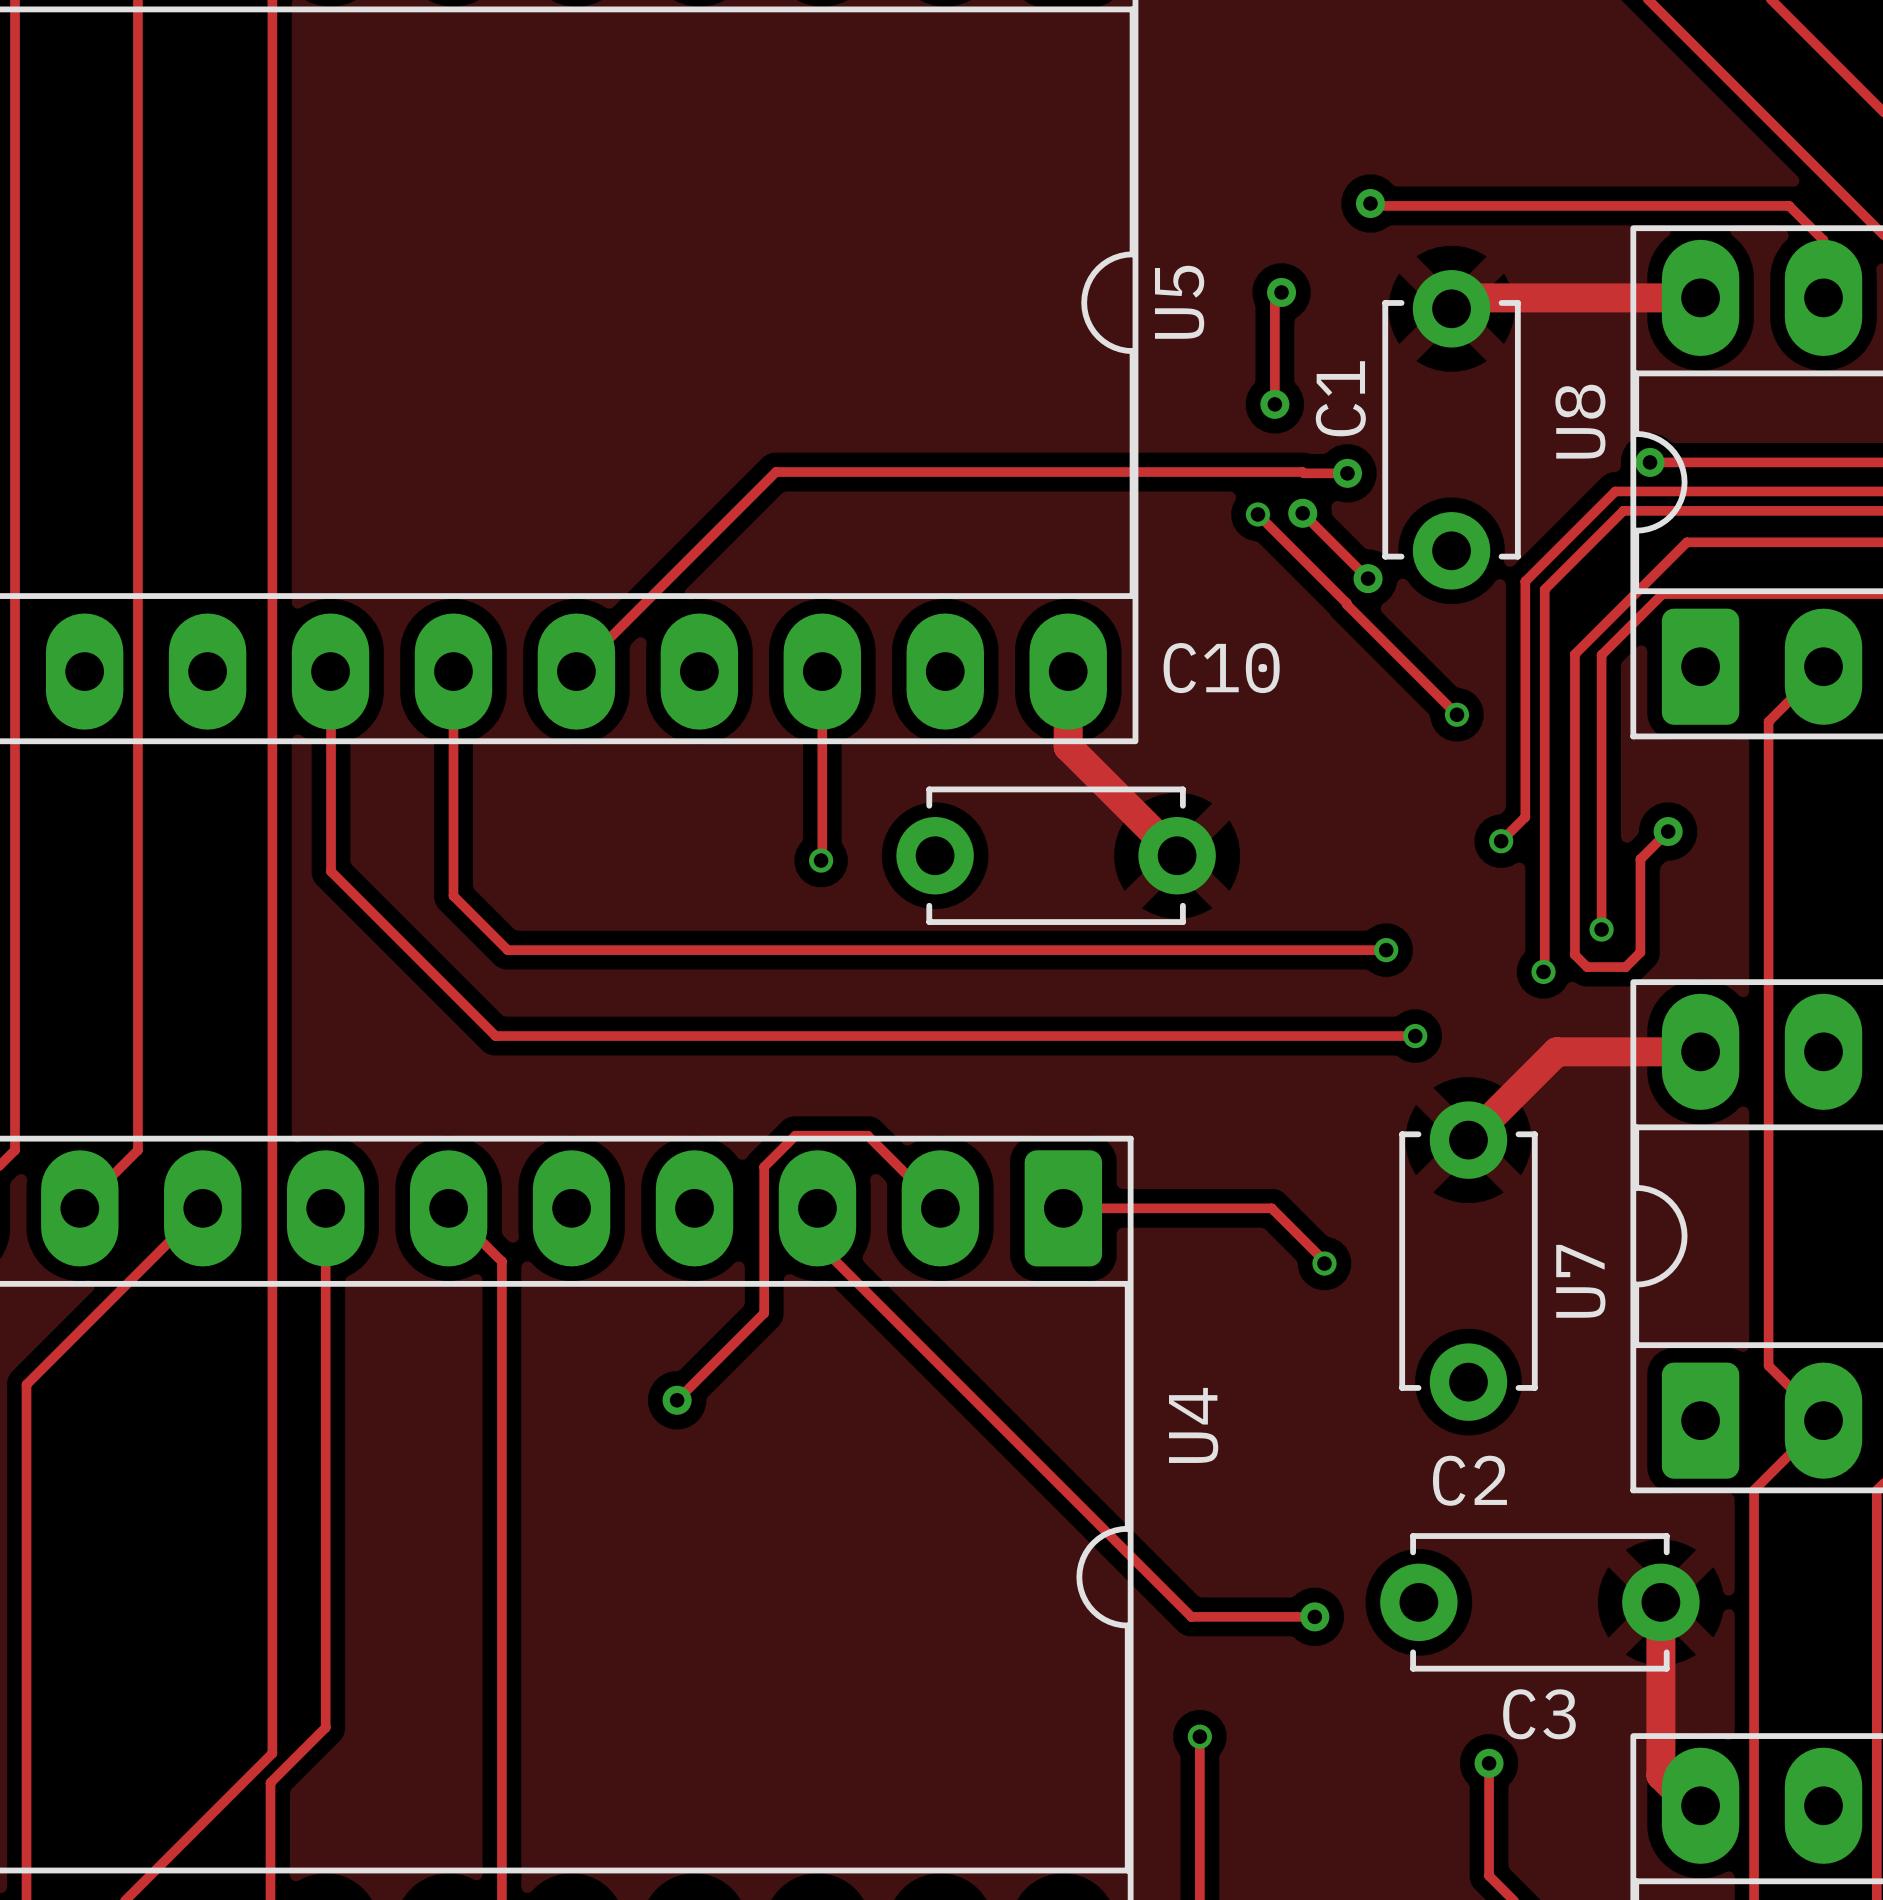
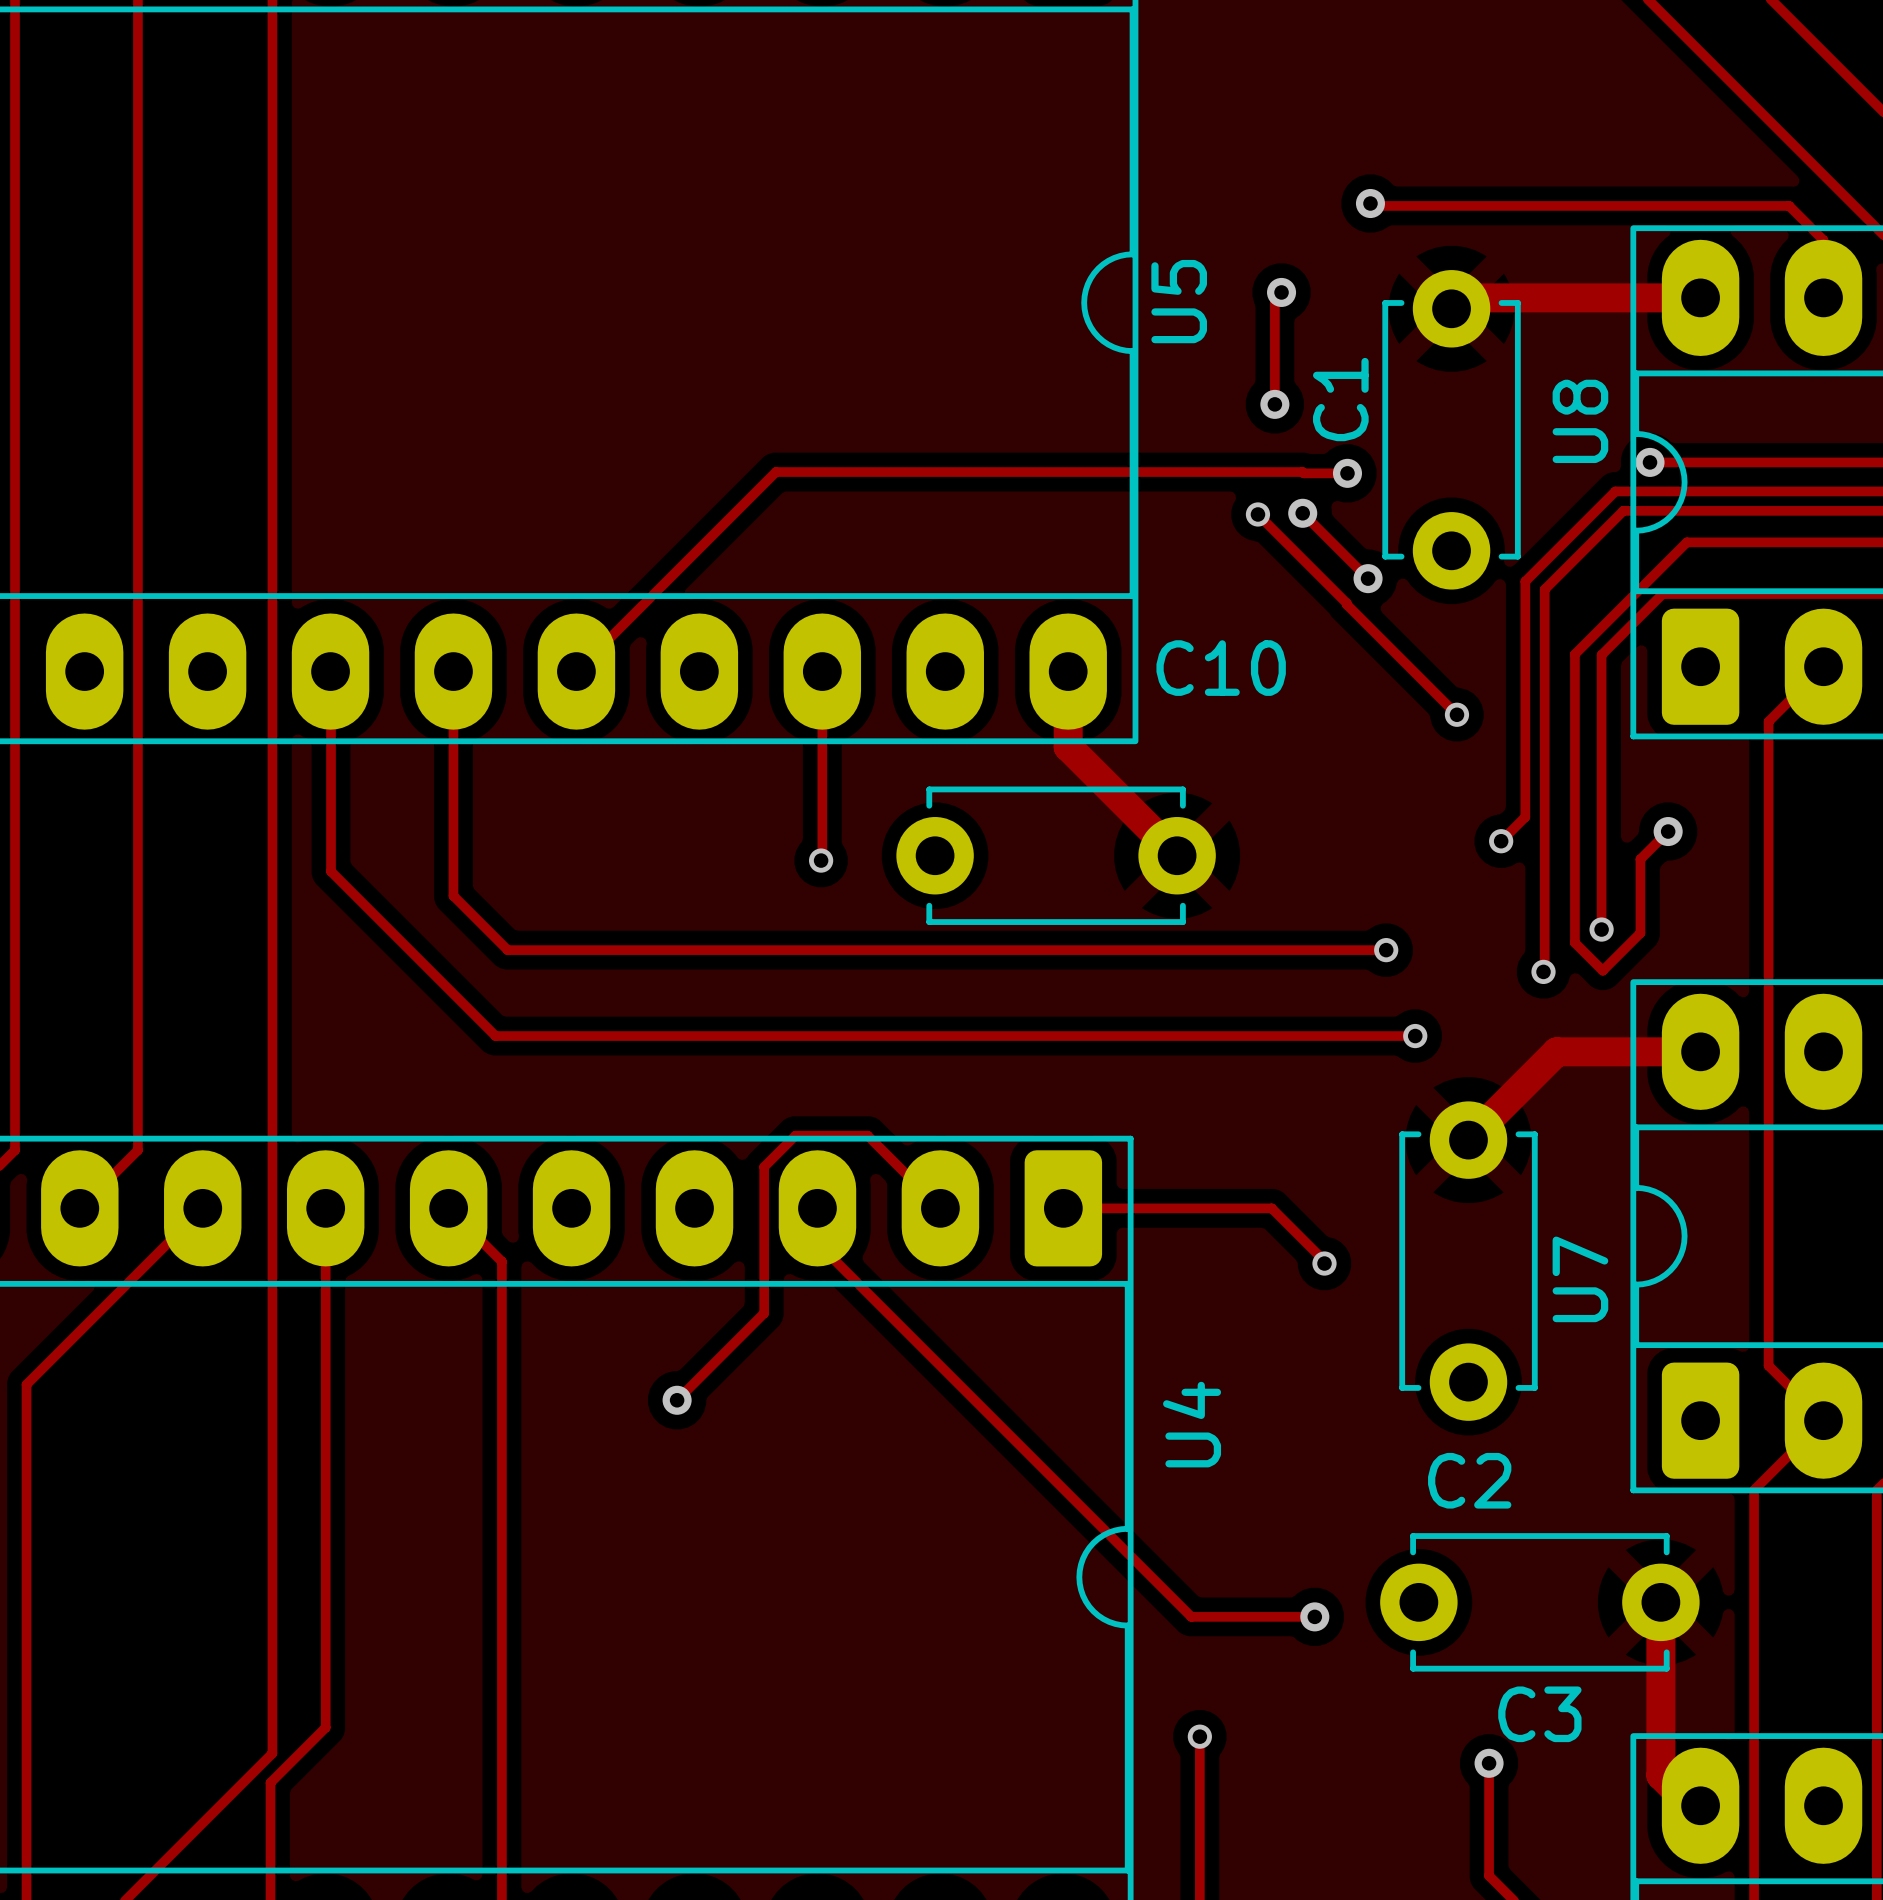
track: (1640, 933) (1640, 952) (1625, 967) (1587, 967) (1574, 954) (1574, 942) -> (1640, 933) (1602, 970) (1574, 942)

